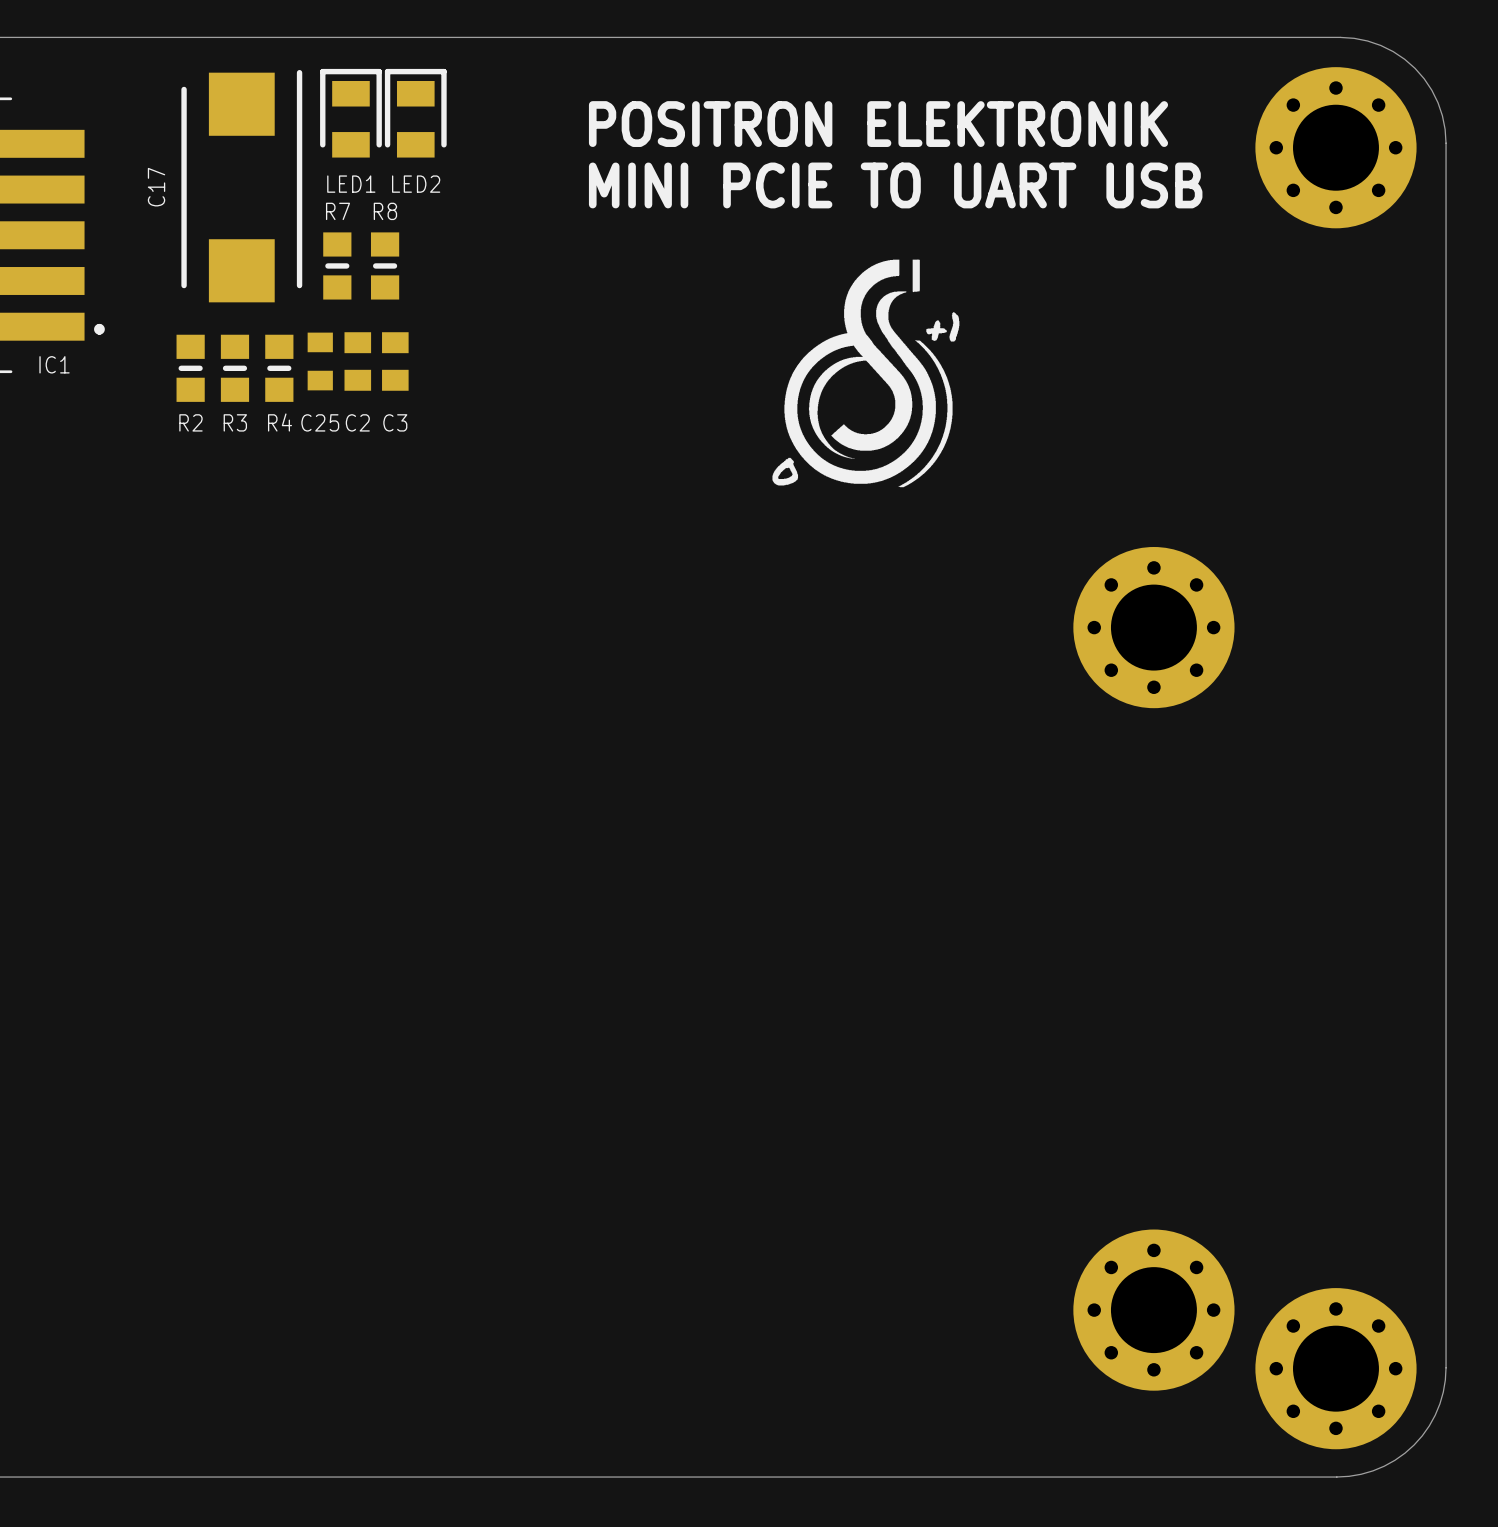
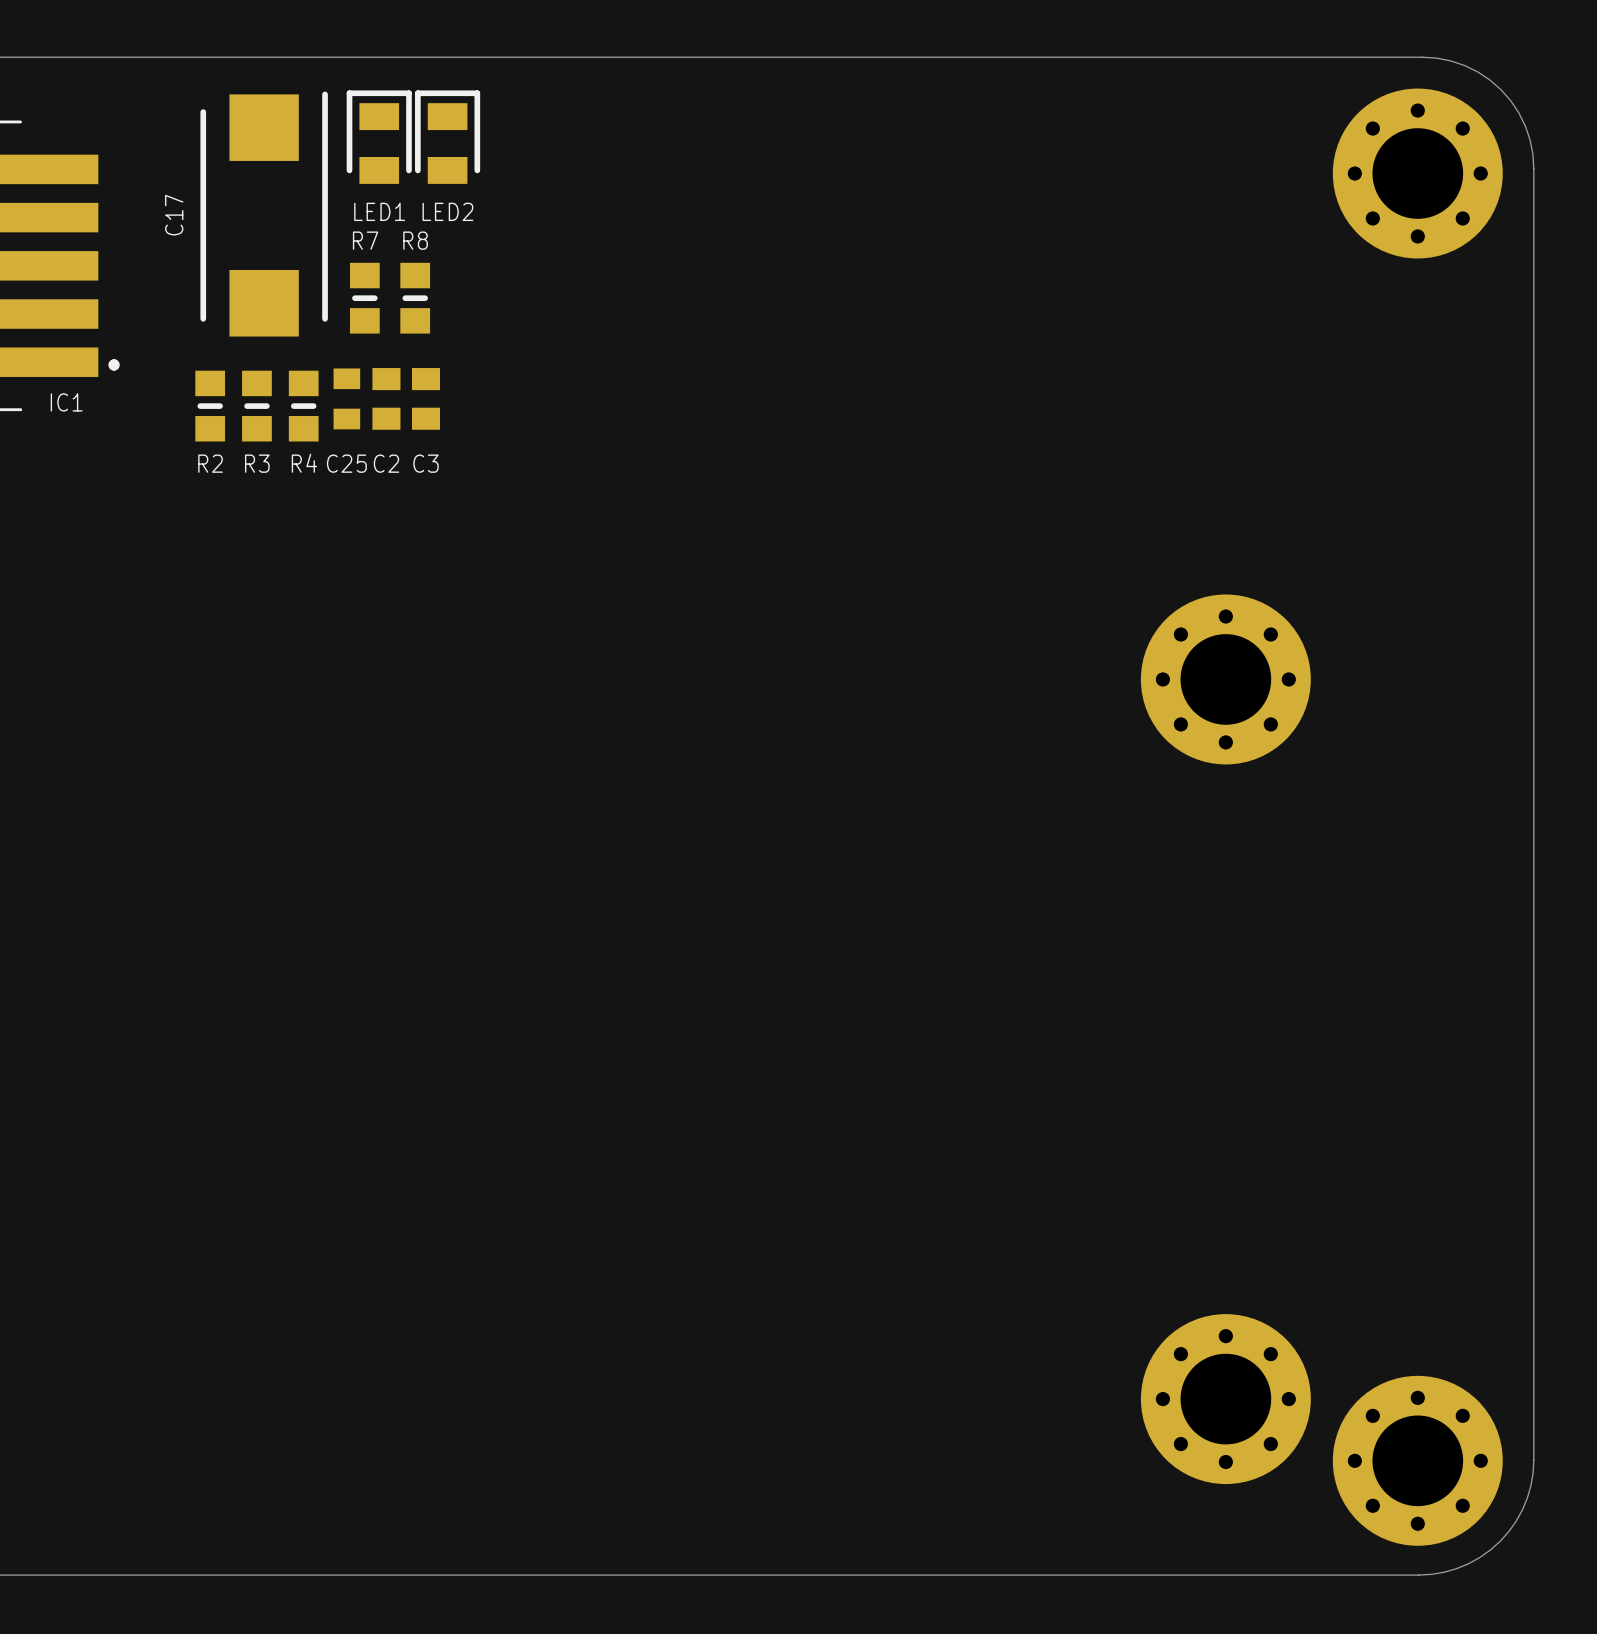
text: POSITRON ELEKTRONIK (878, 124) -> none
text: MINI PCIE TO UART USB (895, 185) -> none
drawing: [772, 259, 960, 488] -> none

